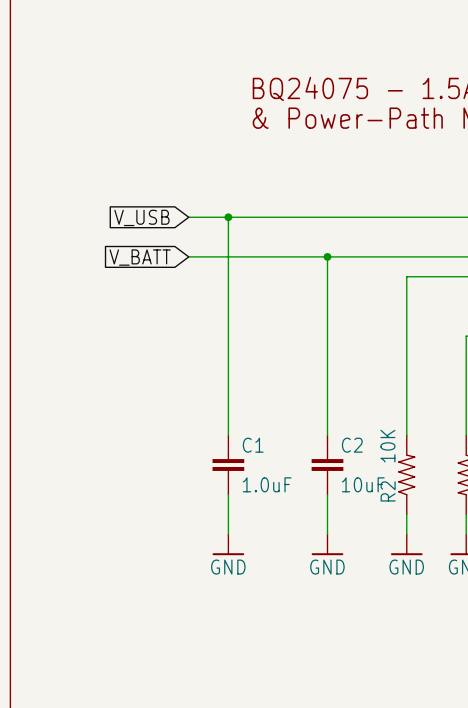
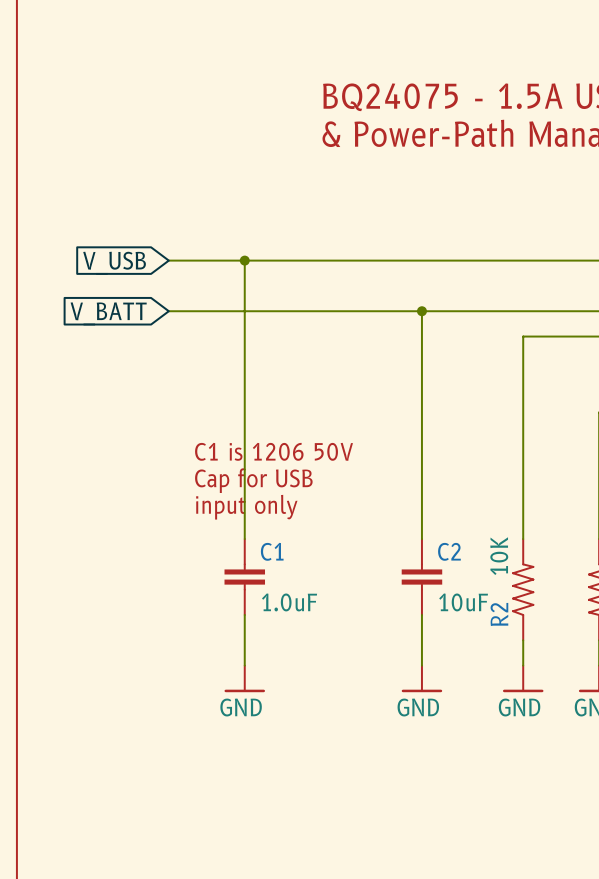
wire: none -> (168, 260) (244, 260) (244, 539)
global label position: V_USB (141, 217) -> V_USB (114, 263)
wire: (228, 217) (228, 435) -> none
junction position: (228, 217) -> (244, 260)
wire: none -> (168, 311) (244, 311)
global label position: V_BATT (140, 257) -> V_BATT (108, 313)
text: none -> C1 is 1206 50V (274, 451)
text: none -> Cap for USB (253, 480)
text: none -> input only (246, 507)
C1 position: (228, 465) -> (244, 577)
wire: (228, 494) (228, 534) -> (244, 615) (244, 665)
power symbol position: GND (228, 544) -> GND (244, 678)

